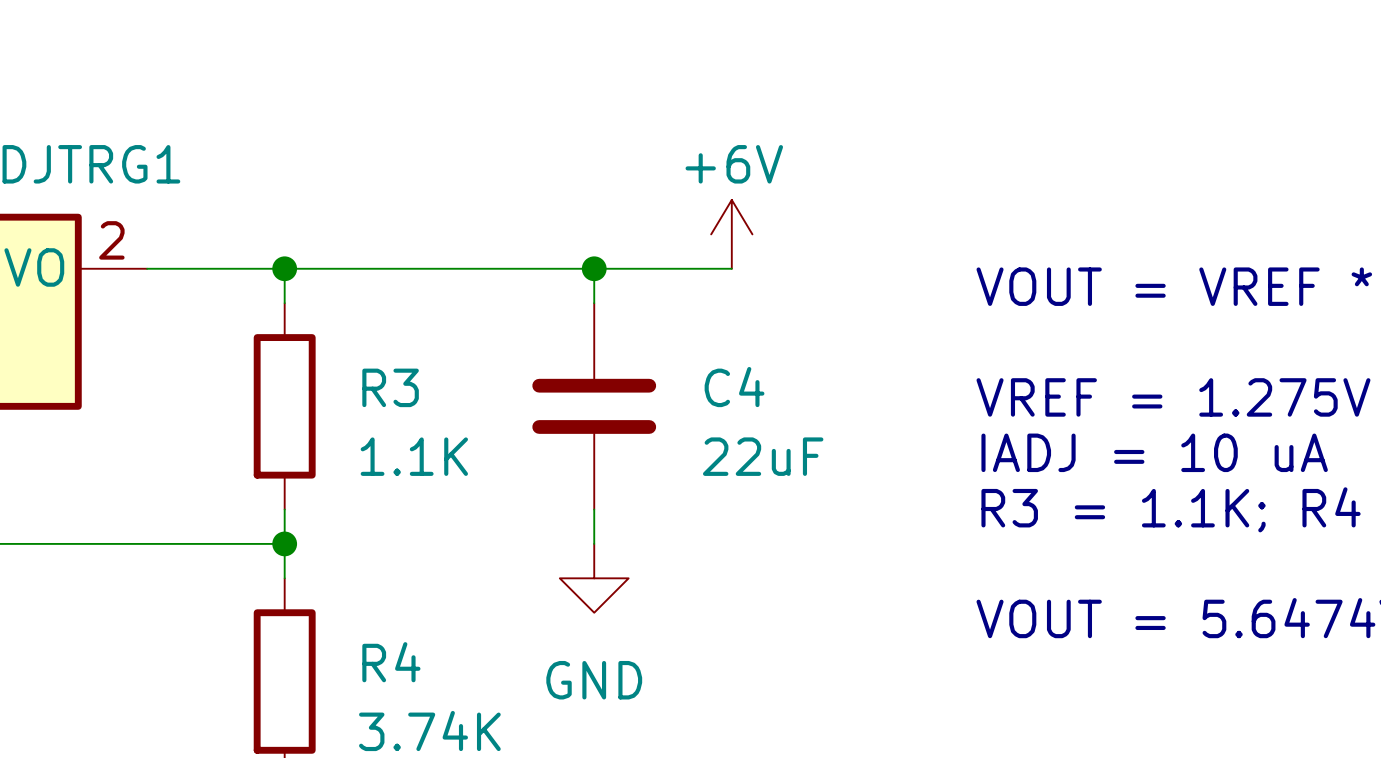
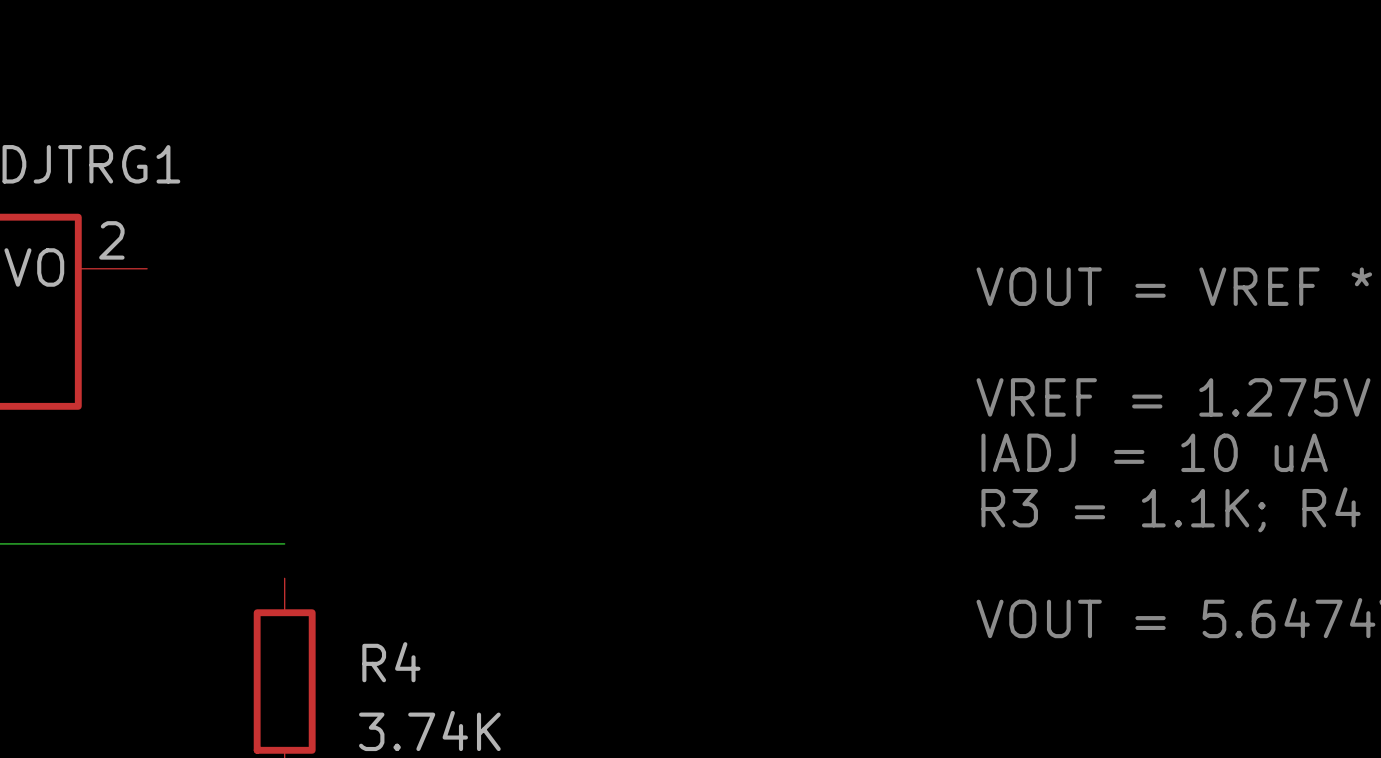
power symbol: +6V (731, 234) -> none
wire: (147, 268) (731, 268) -> none
wire: (284, 268) (284, 303) -> none
junction: (284, 268) -> none
wire: (594, 268) (594, 303) -> none
junction: (594, 268) -> none
R3: 1.1K (284, 406) -> none
C4: 22uF (594, 406) -> none
wire: (284, 509) (284, 578) -> none
wire: (594, 509) (594, 543) -> none
junction: (284, 543) -> none
power symbol: GND (594, 578) -> none

